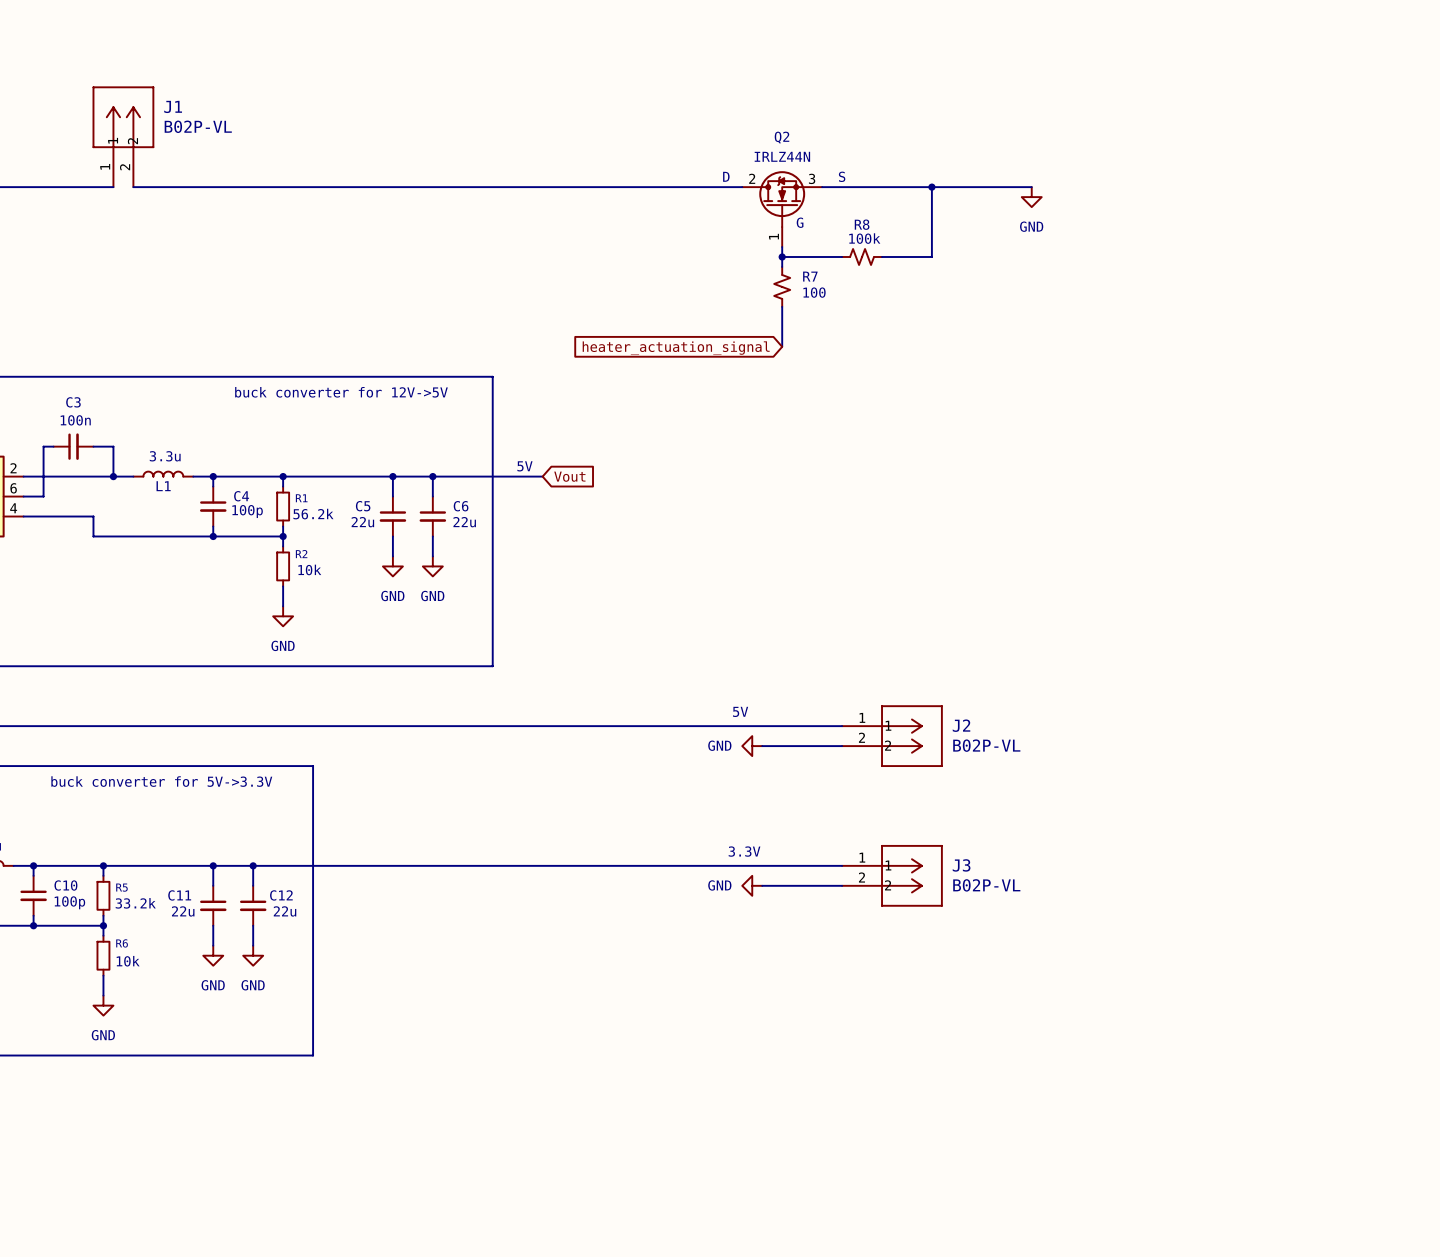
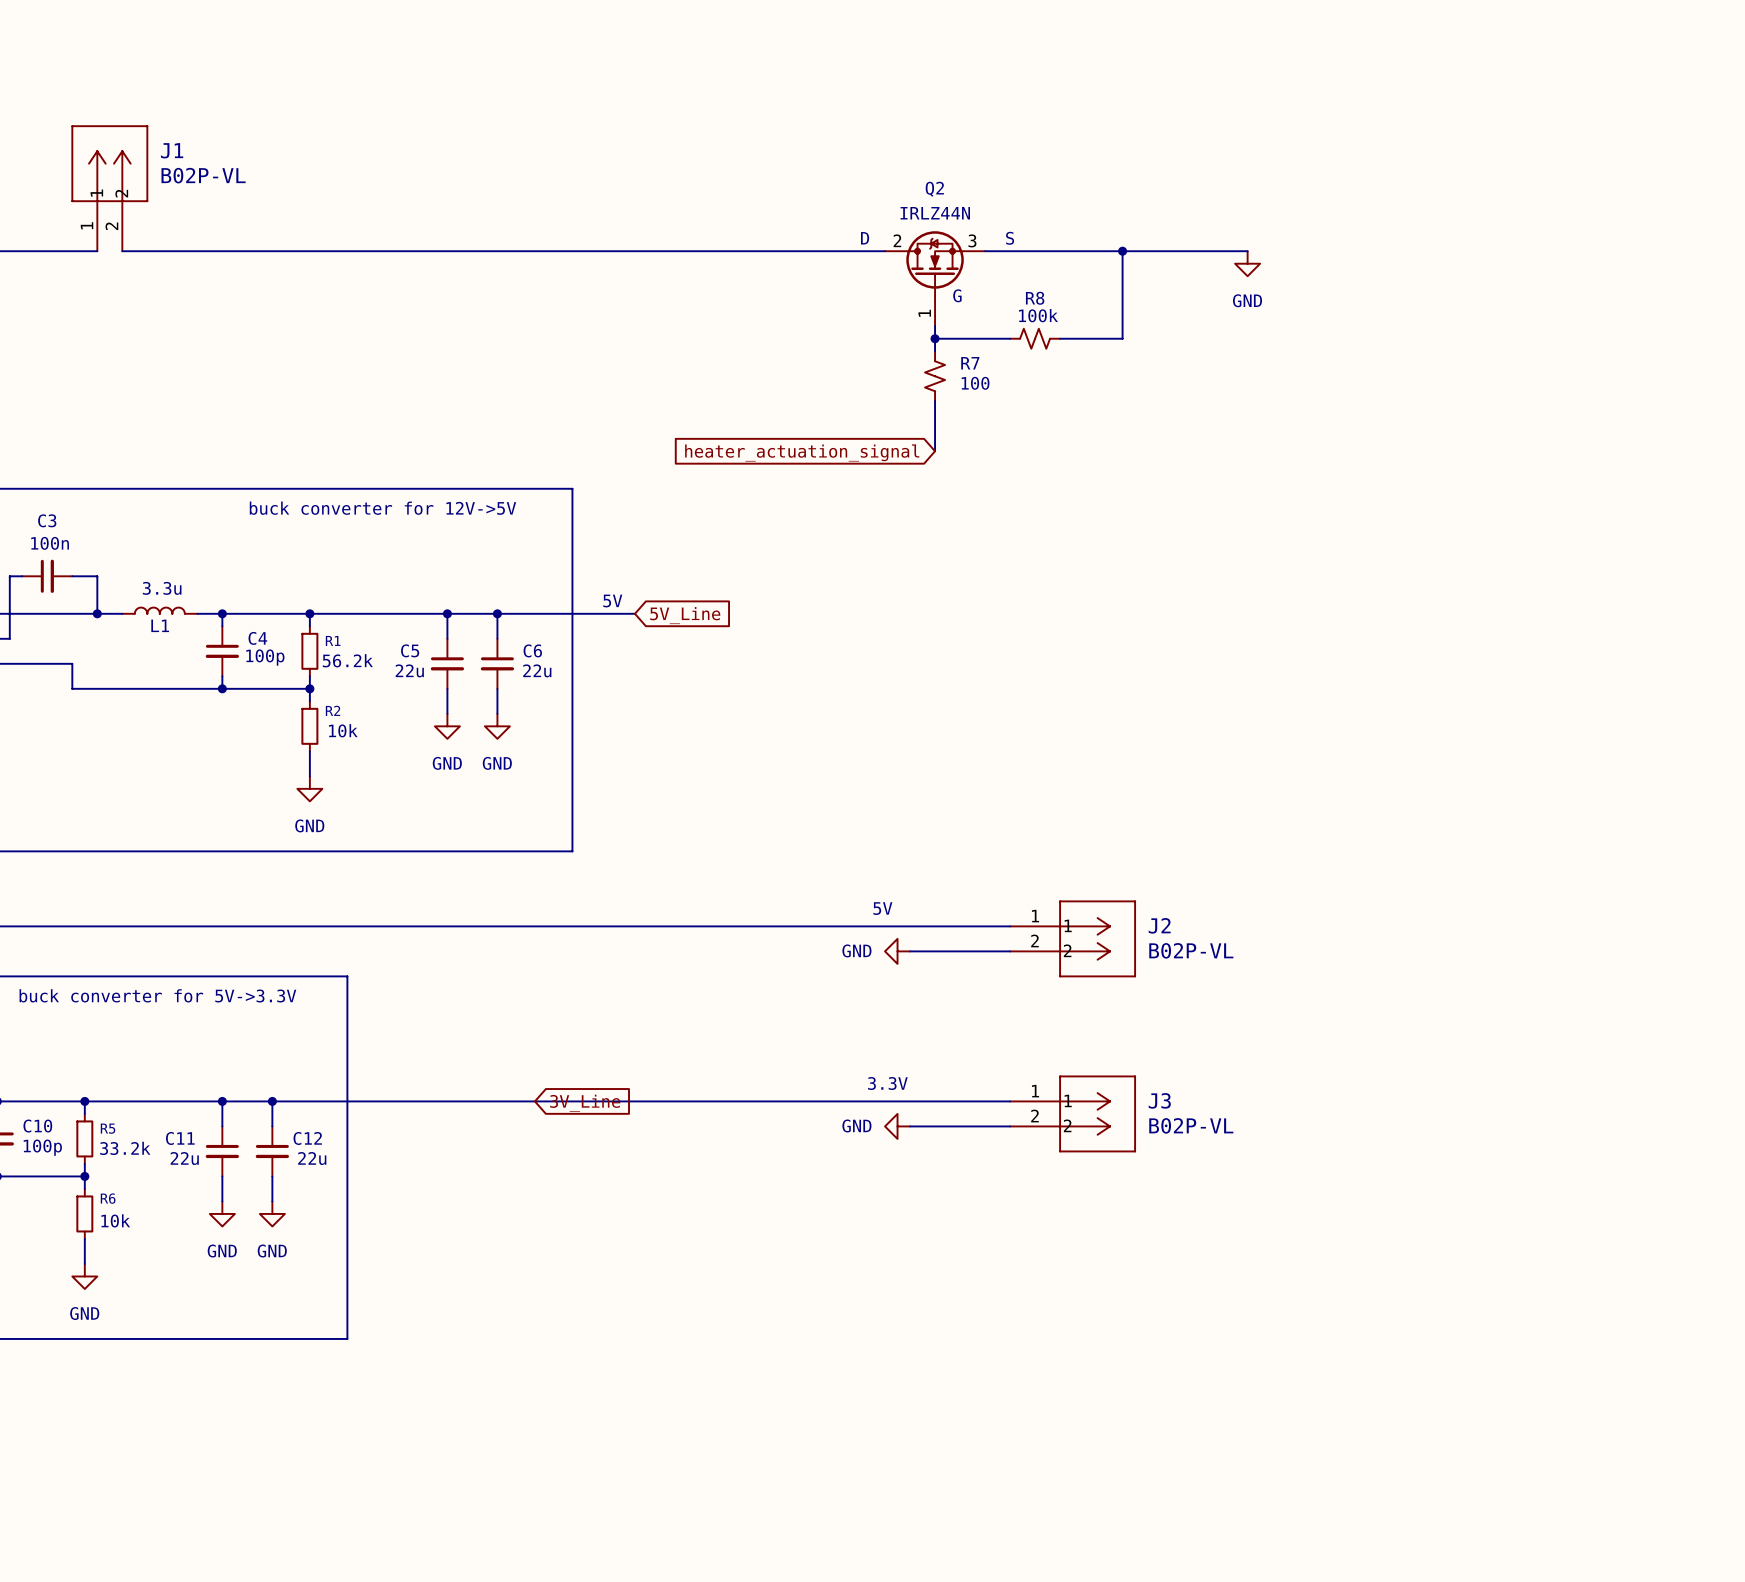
global label: Vout (569, 476) -> 5V_Line (685, 615)
global label: none -> 3V_Line (585, 1103)

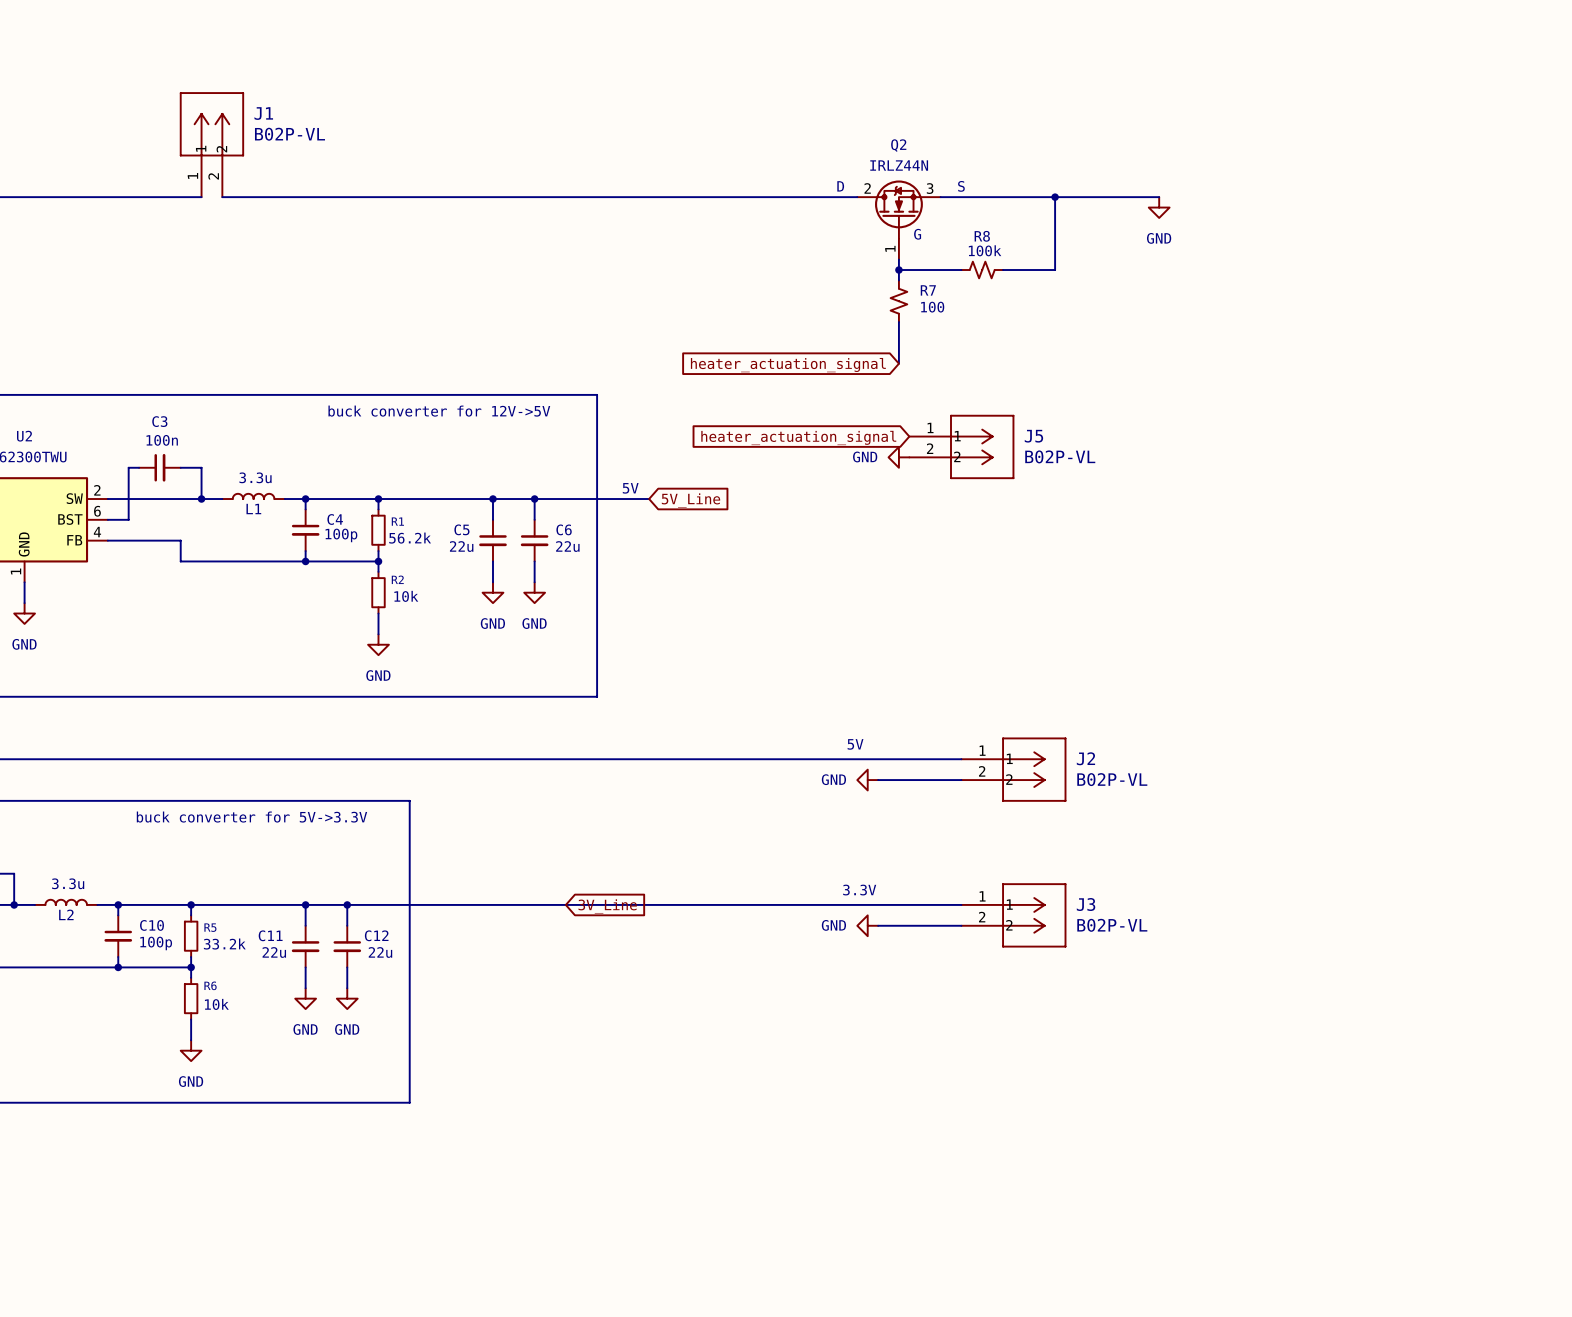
global label: none -> heater_actuation_signal (798, 437)
J5: none -> B02P-VL (961, 446)
power symbol: none -> GND (898, 457)

